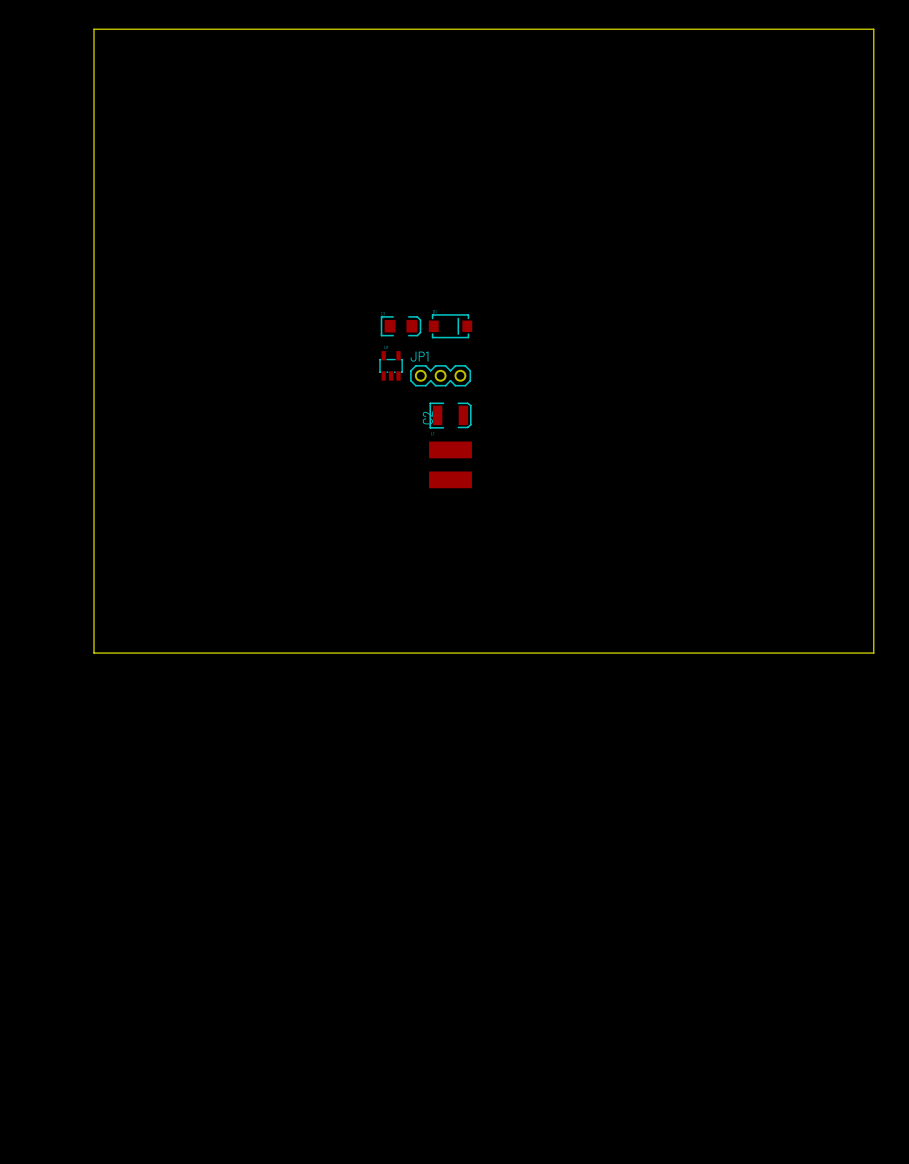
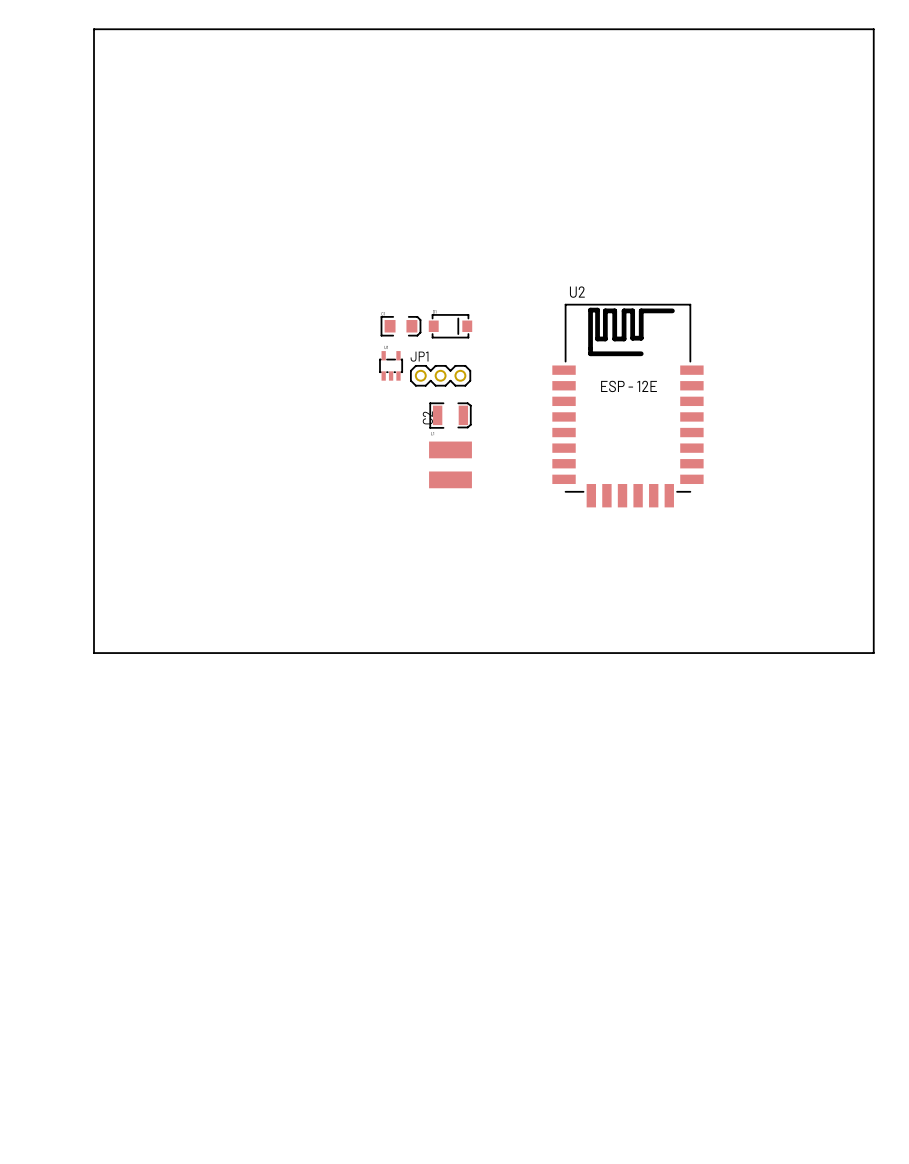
U2: none -> (627, 405)

